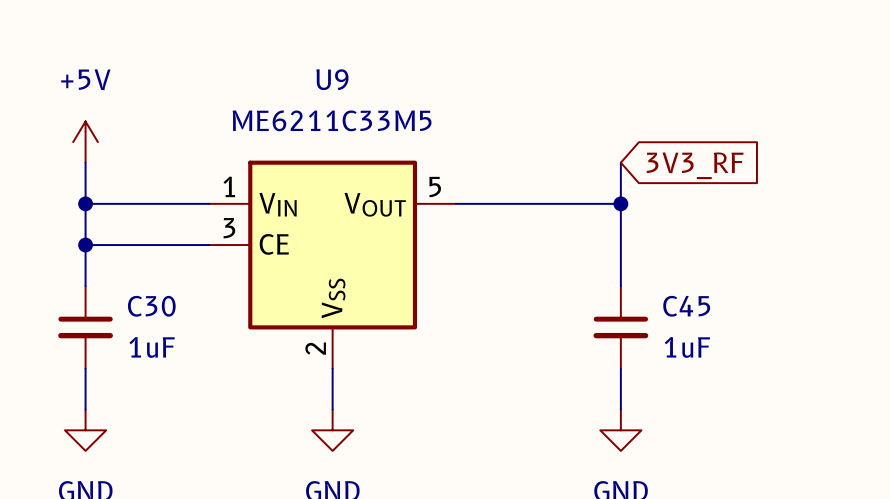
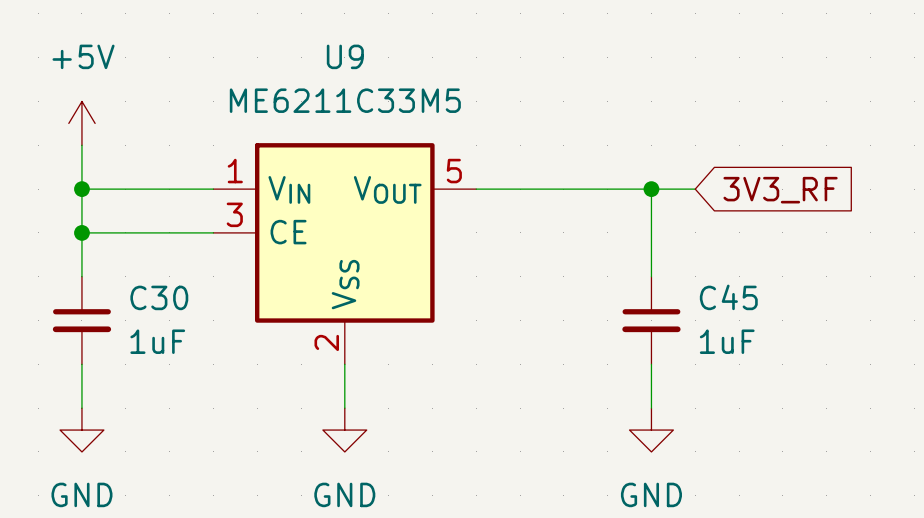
wire: (620, 162) (620, 203) -> (695, 189) (651, 189)
global label position: 3V3_RF (695, 165) -> 3V3_RF (780, 190)

